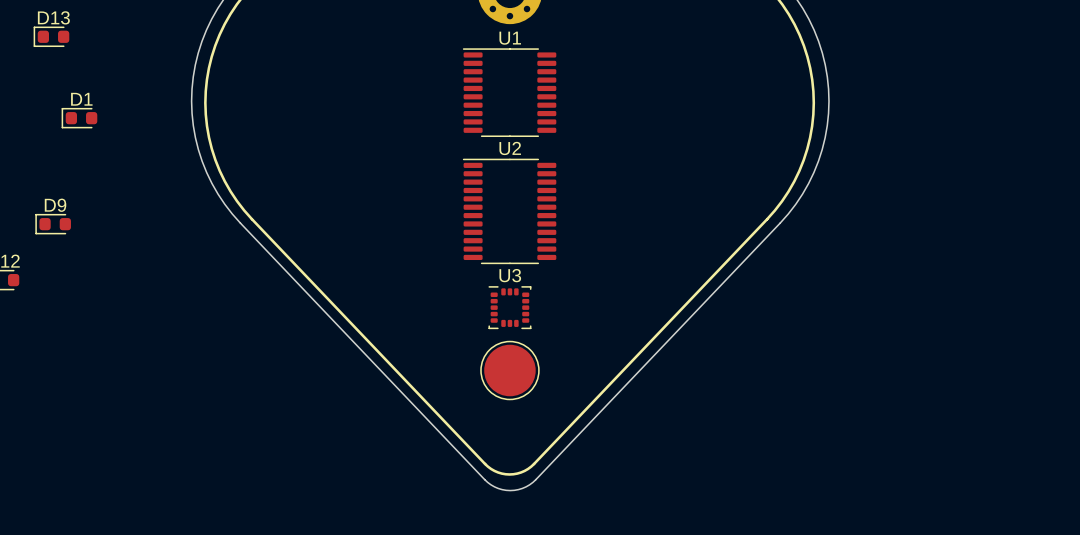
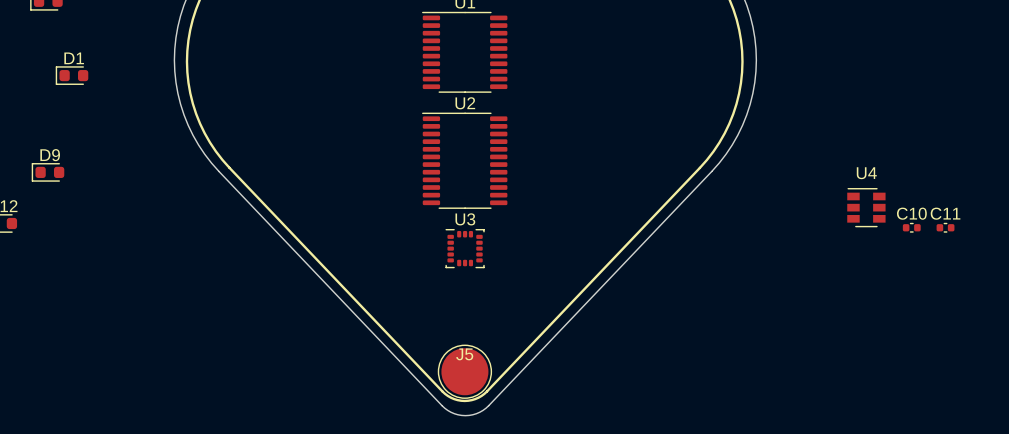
U4: none -> (866, 207)
C10: none -> (911, 227)
C11: none -> (945, 227)
part: (509, 370) -> none
J5: none -> (464, 371)

